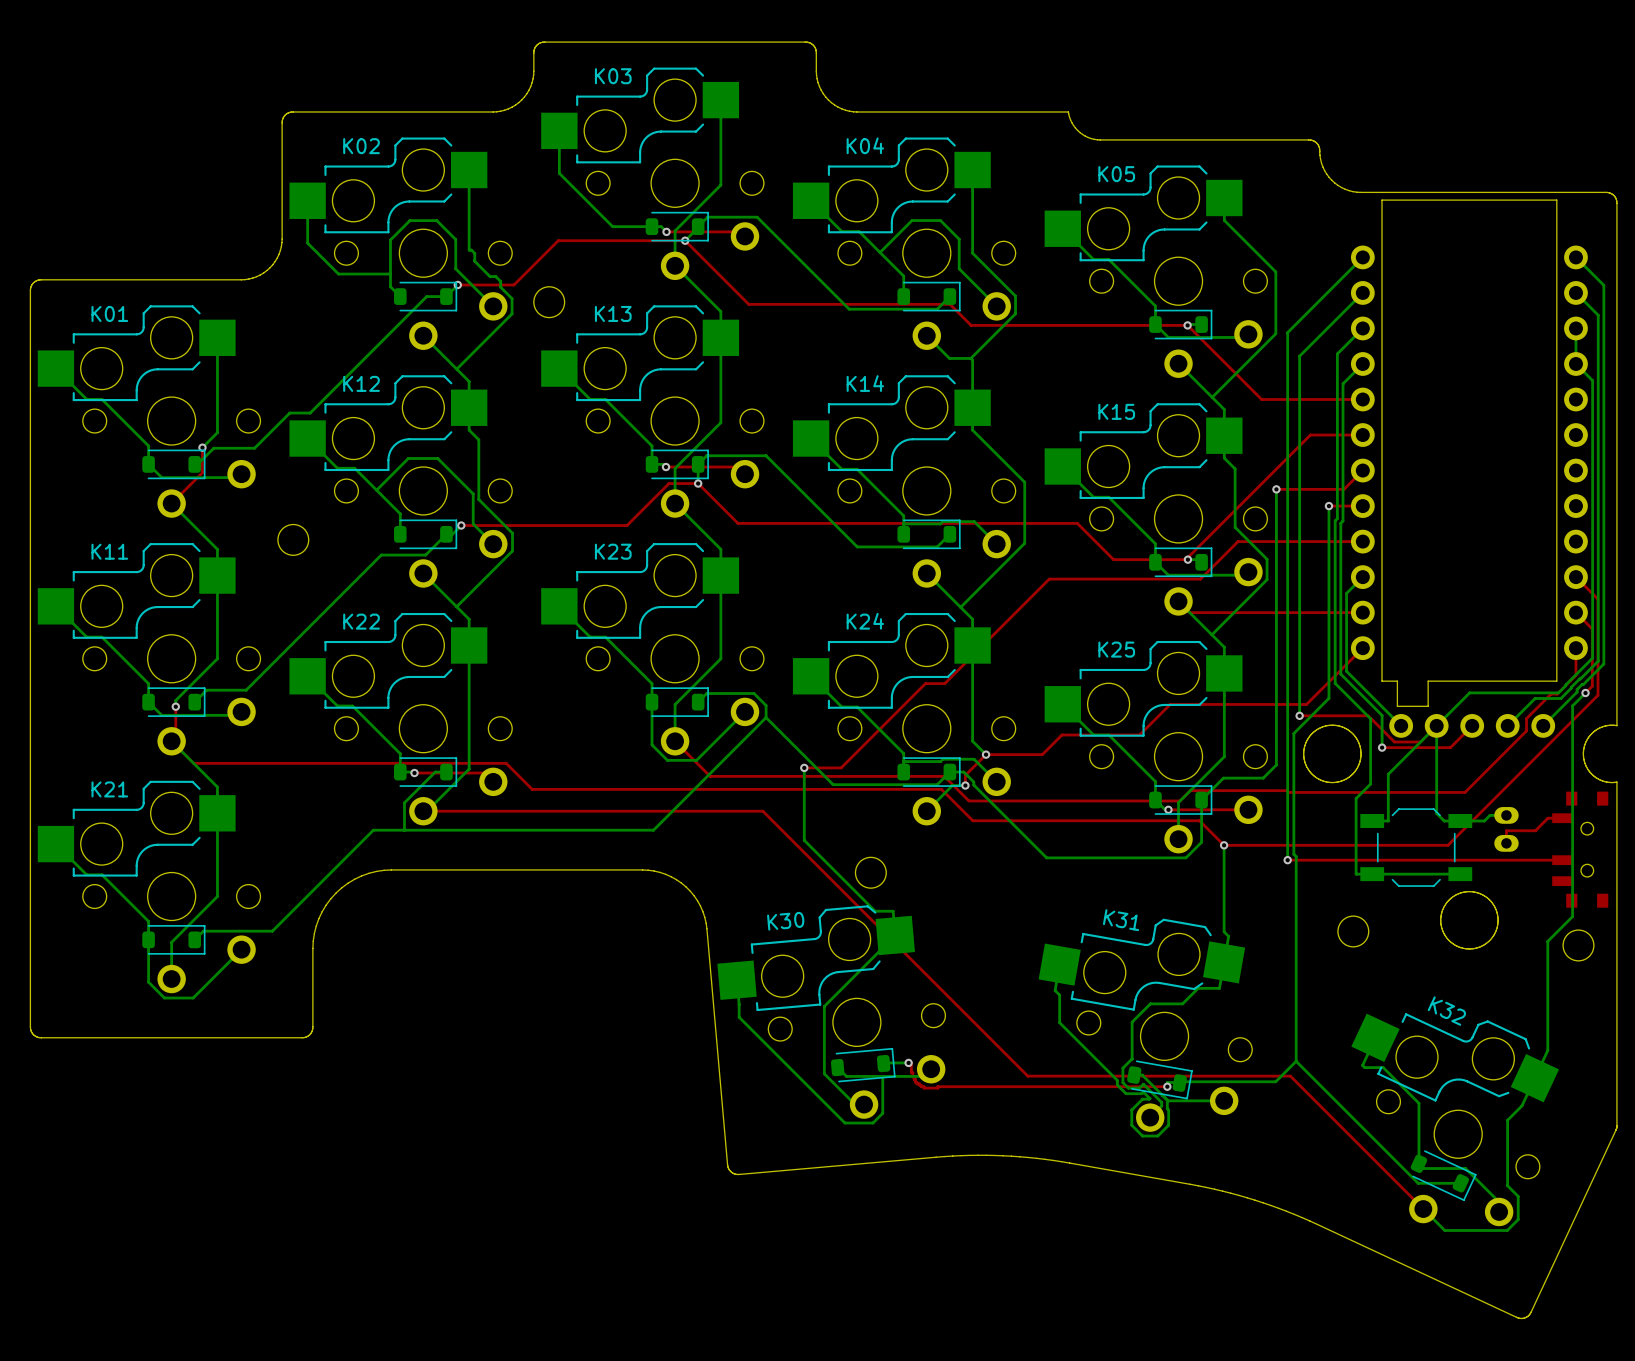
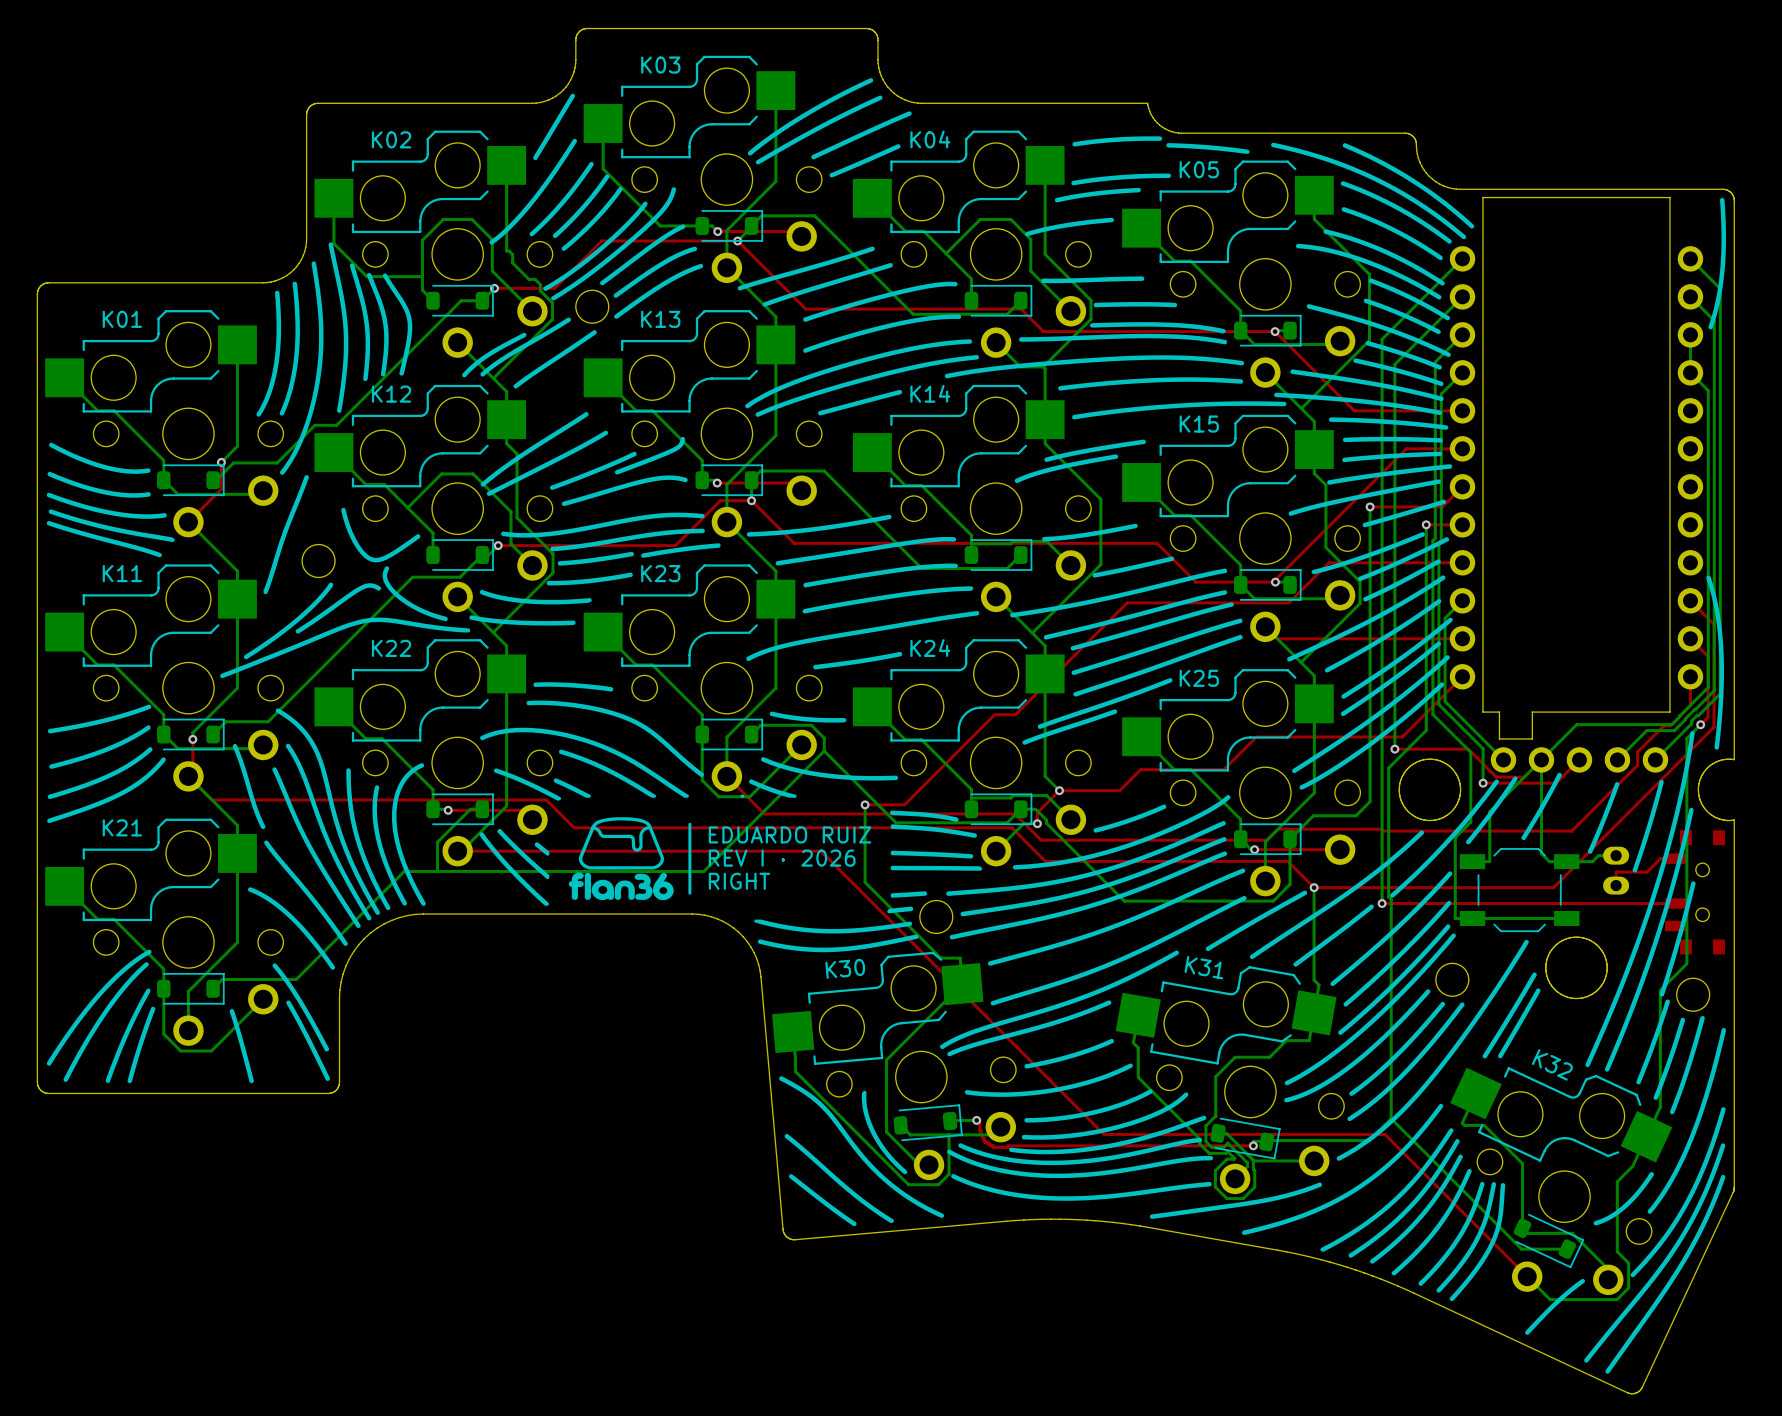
drawing: none -> [747, 78, 912, 178]
drawing: none -> [462, 93, 704, 389]
drawing: none -> [1072, 136, 1250, 154]
drawing: none -> [737, 142, 1562, 1302]
drawing: none -> [1025, 173, 1171, 237]
drawing: none -> [1708, 197, 1726, 330]
drawing: none -> [220, 242, 721, 679]
drawing: none -> [1041, 276, 1145, 284]
drawing: none -> [1014, 439, 1146, 484]
drawing: none -> [46, 442, 175, 558]
drawing: none -> [746, 514, 980, 670]
drawing: none -> [1010, 523, 1243, 745]
drawing: none -> [1525, 575, 1726, 1374]
drawing: none -> [480, 682, 704, 801]
drawing: none -> [47, 704, 166, 824]
drawing: none -> [232, 708, 426, 1081]
drawing: none -> [769, 711, 847, 723]
drawing: none -> [740, 757, 899, 798]
drawing: none -> [568, 817, 692, 901]
drawing: none -> [479, 828, 550, 906]
text: none -> EDUARDO RUIZ (790, 834)
text: none -> REV I · 2026 (782, 858)
text: none -> RIGHT (739, 881)
drawing: none -> [754, 891, 928, 953]
drawing: none -> [46, 949, 156, 1084]
drawing: none -> [229, 1009, 254, 1084]

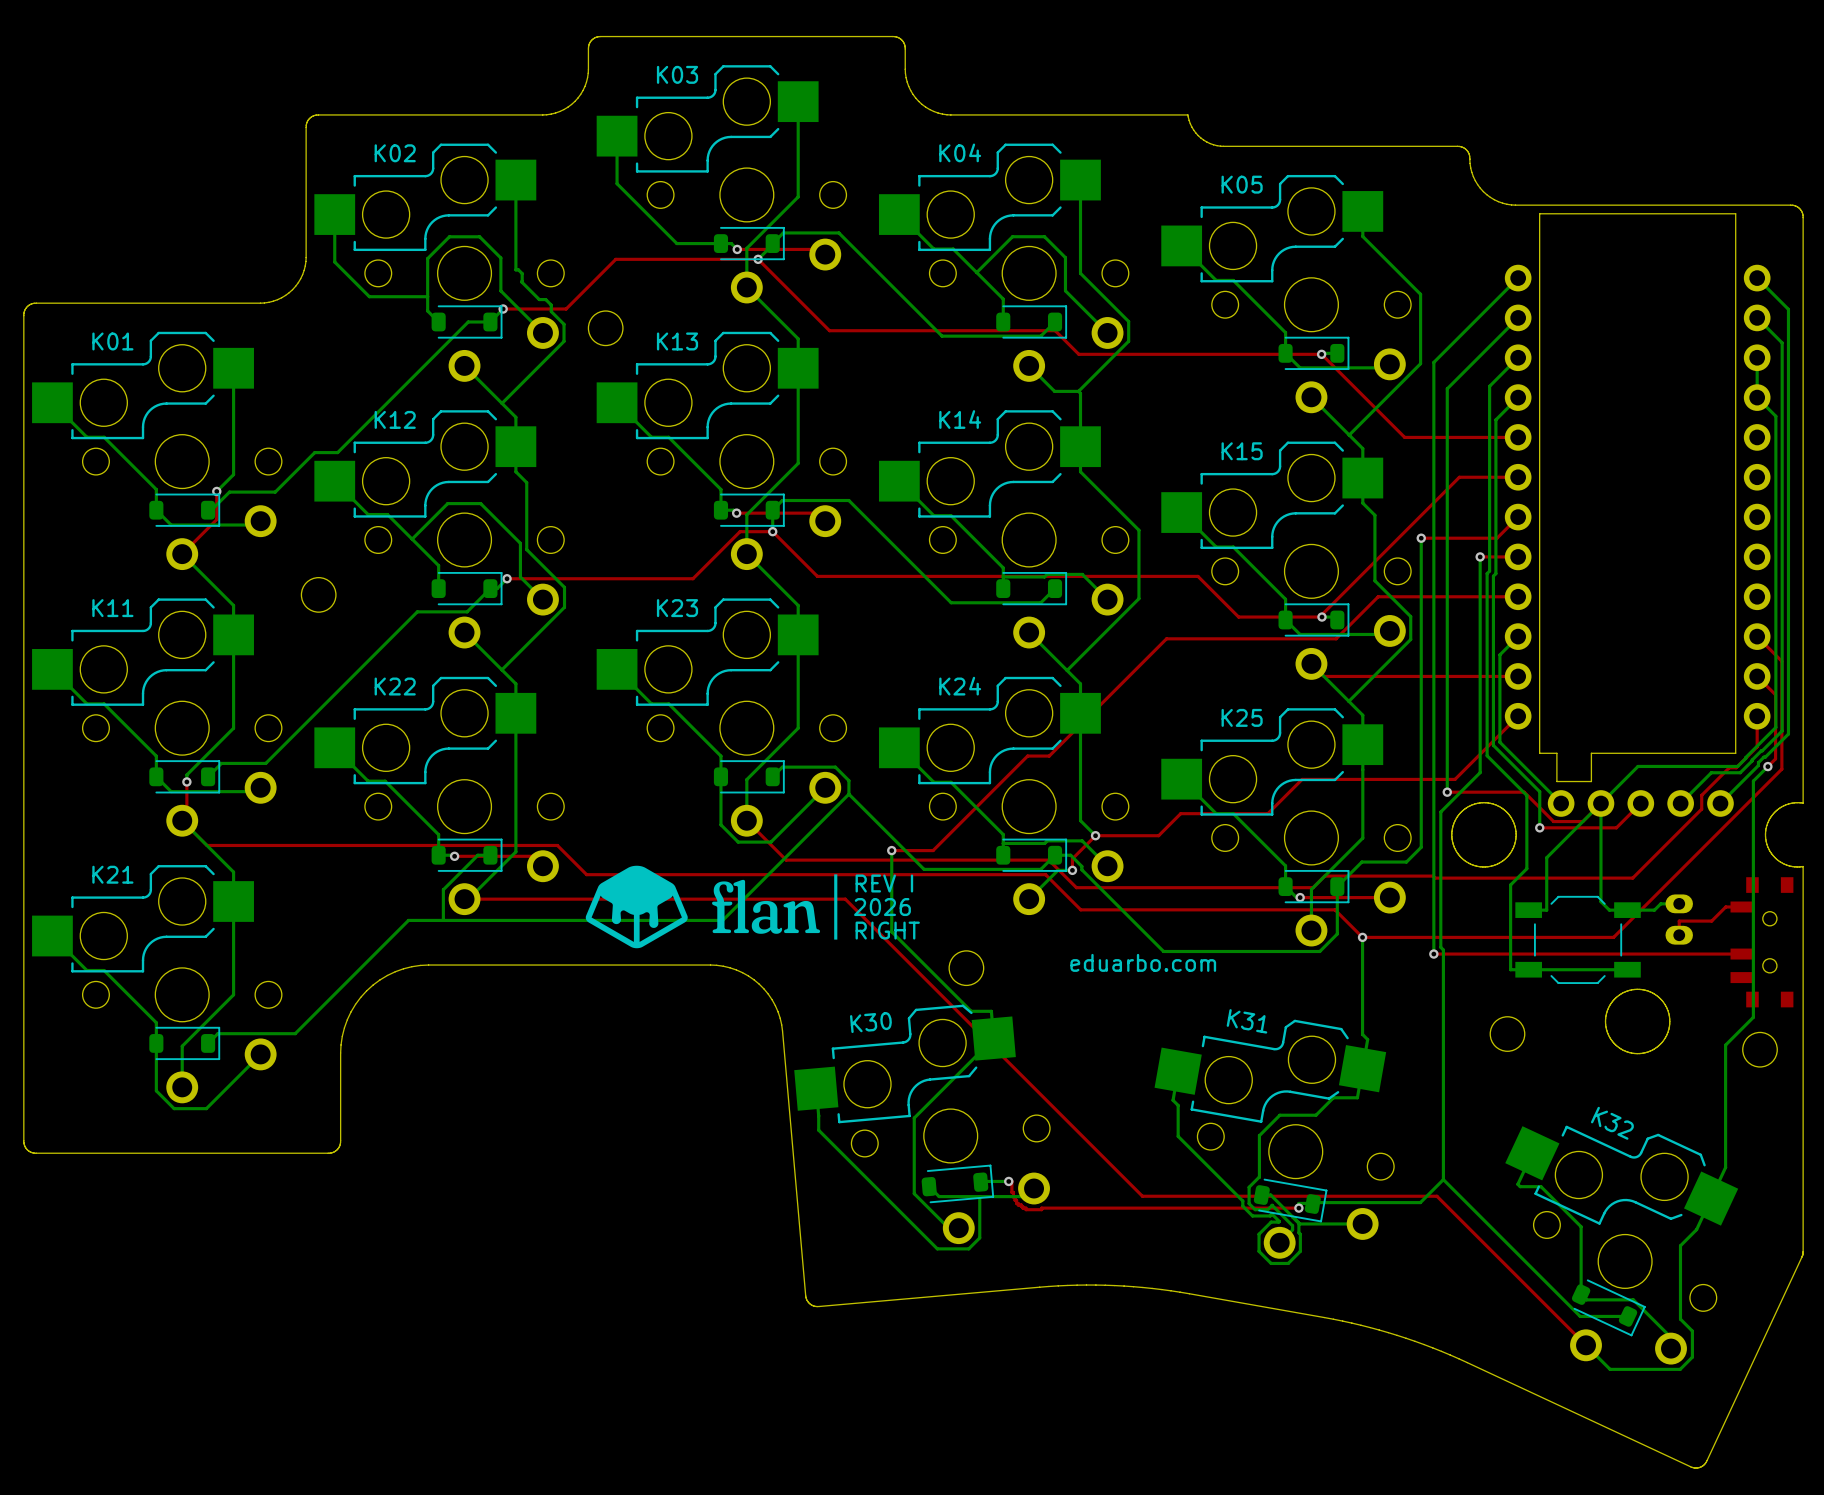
drawing: [747, 78, 912, 178] -> none
drawing: [462, 93, 704, 389] -> none
drawing: [1072, 136, 1250, 154] -> none
drawing: [737, 142, 1562, 1302] -> none
drawing: [1025, 173, 1171, 237] -> none
drawing: [1708, 197, 1726, 330] -> none
drawing: [220, 242, 721, 679] -> none
drawing: [1041, 276, 1145, 284] -> none
drawing: [1014, 439, 1146, 484] -> none
drawing: [46, 442, 175, 558] -> none
drawing: [746, 514, 980, 670] -> none
drawing: [1010, 523, 1243, 745] -> none
drawing: [1525, 575, 1726, 1374] -> none
drawing: [480, 682, 704, 801] -> none
drawing: [47, 704, 166, 824] -> none
drawing: [232, 708, 426, 1081] -> none
drawing: [769, 711, 847, 723] -> none
drawing: [740, 757, 899, 798] -> none
drawing: [568, 817, 692, 901] -> none
drawing: none -> [585, 865, 688, 949]
drawing: none -> [712, 874, 838, 940]
drawing: [479, 828, 550, 906] -> none
text: EDUARDO RUIZ (790, 834) -> none
text: none -> REV I (884, 883)
text: REV I · 2026 (782, 858) -> none
text: none -> 2026 (882, 907)
text position: RIGHT (739, 881) -> RIGHT (887, 930)
drawing: [754, 891, 928, 953] -> none
text: none -> eduarbo.com (1143, 962)
drawing: [46, 949, 156, 1084] -> none
drawing: [229, 1009, 254, 1084] -> none

